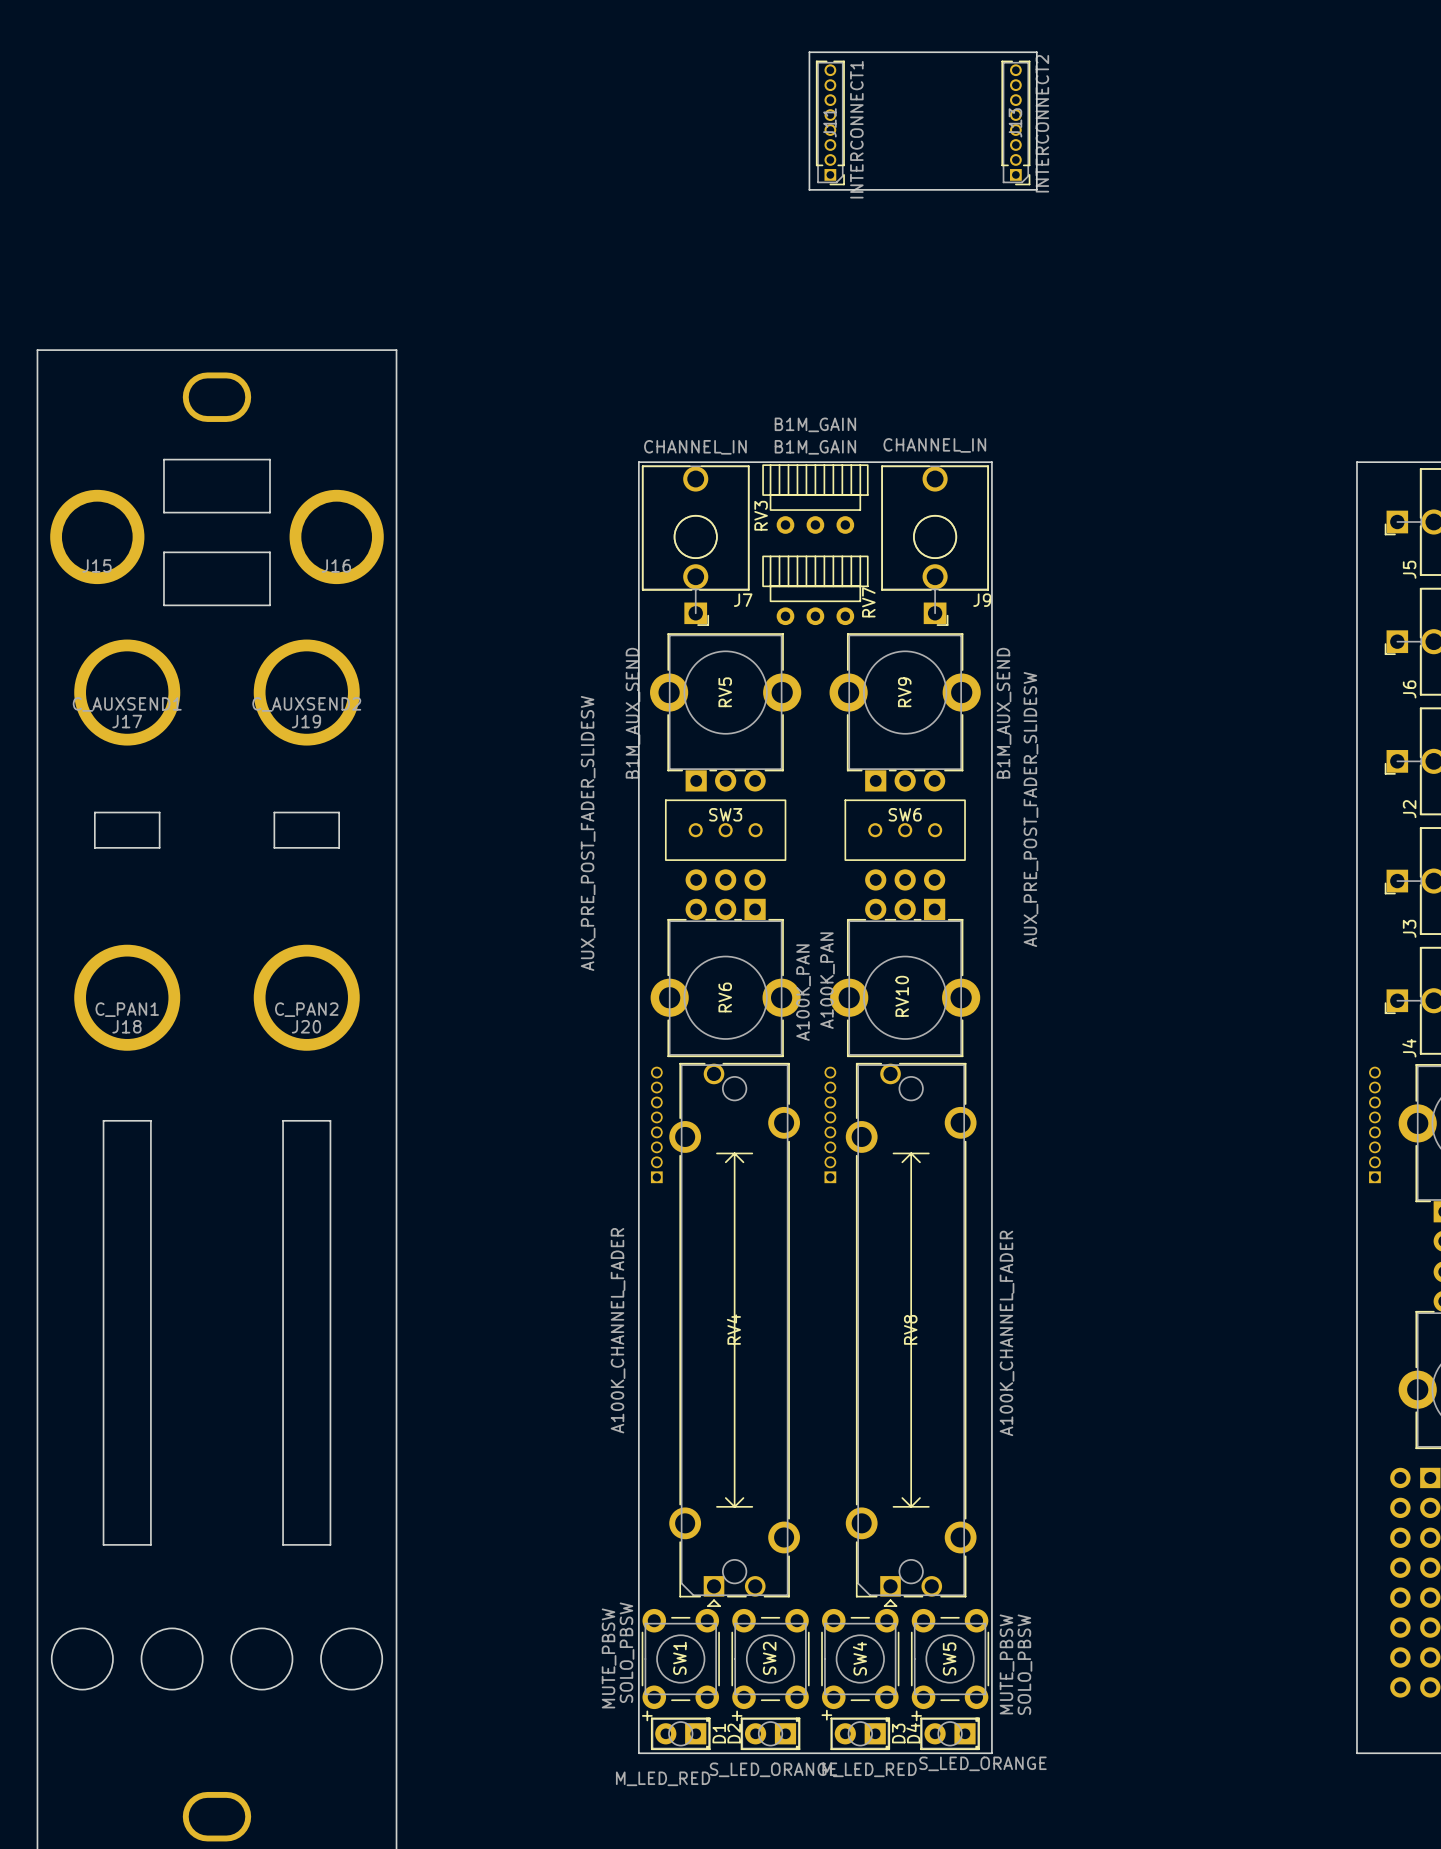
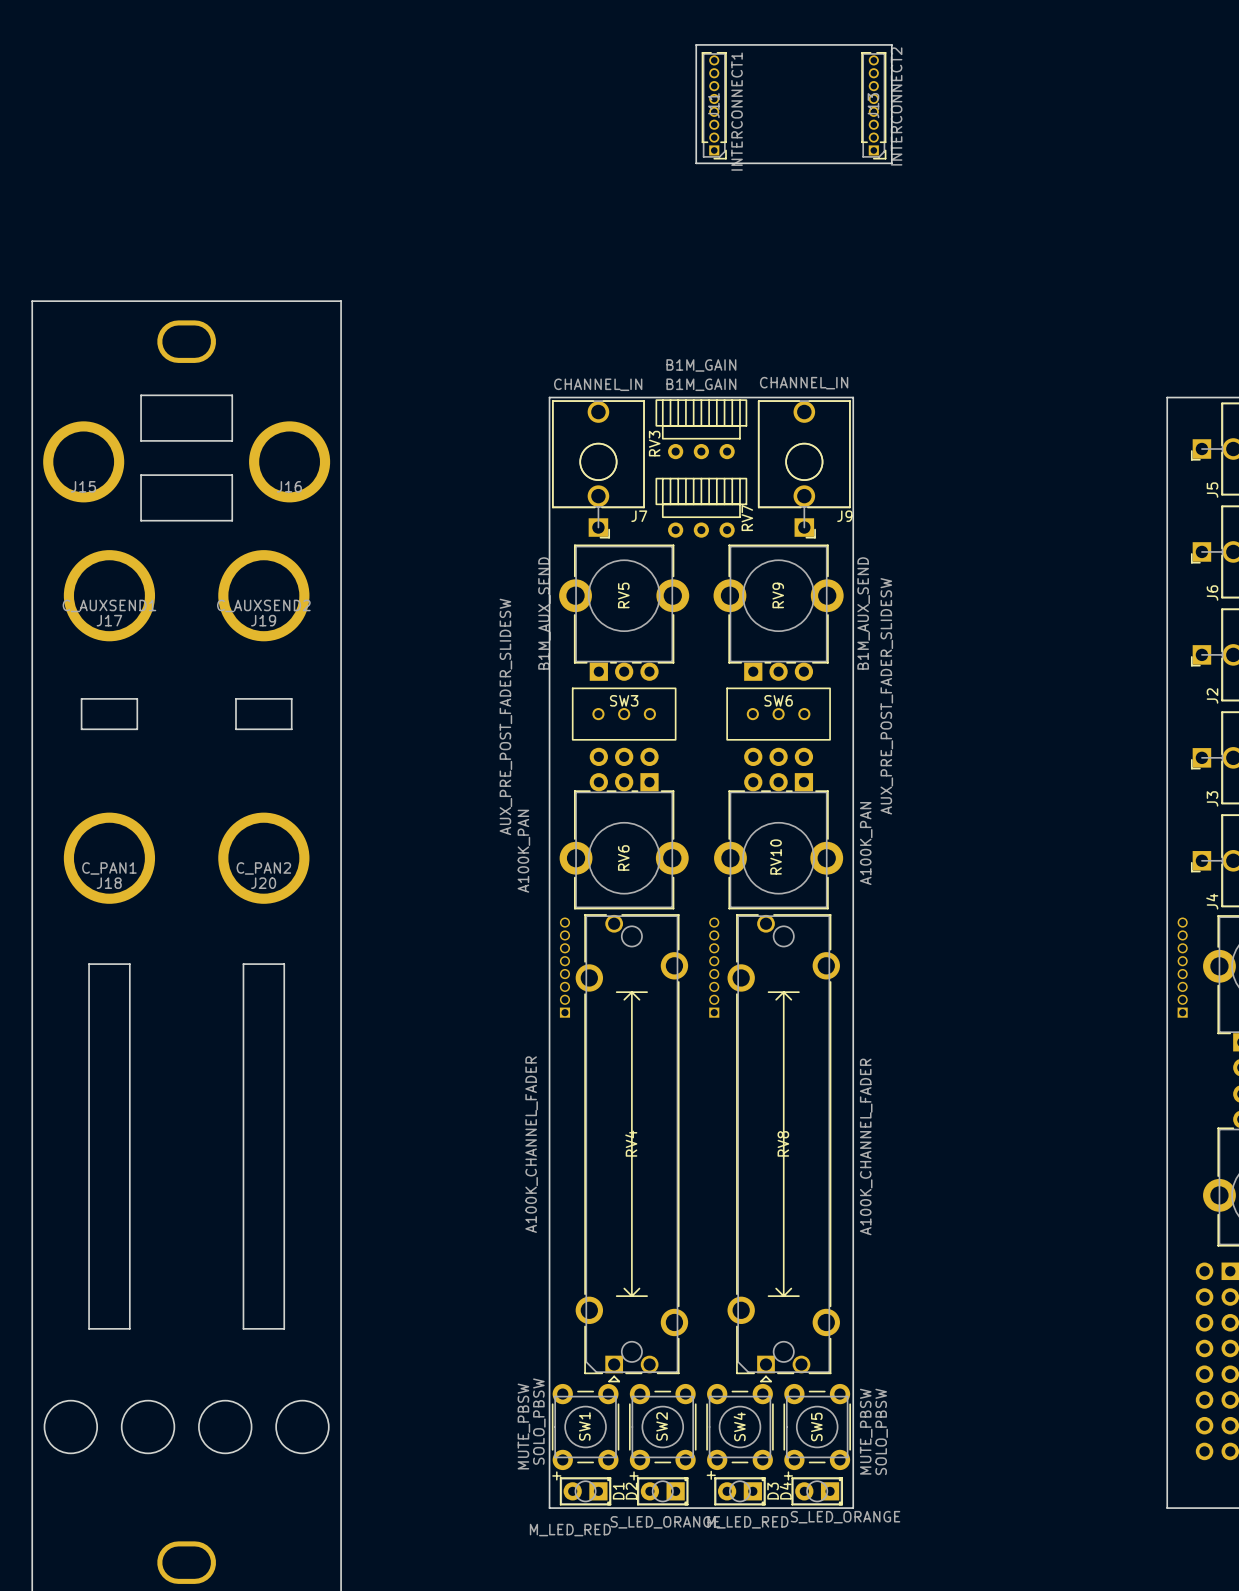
RV6 value position: A100K_PAN (827, 980) -> A100K_PAN (866, 843)
RV10 value position: A100K_PAN (803, 992) -> A100K_PAN (523, 851)

